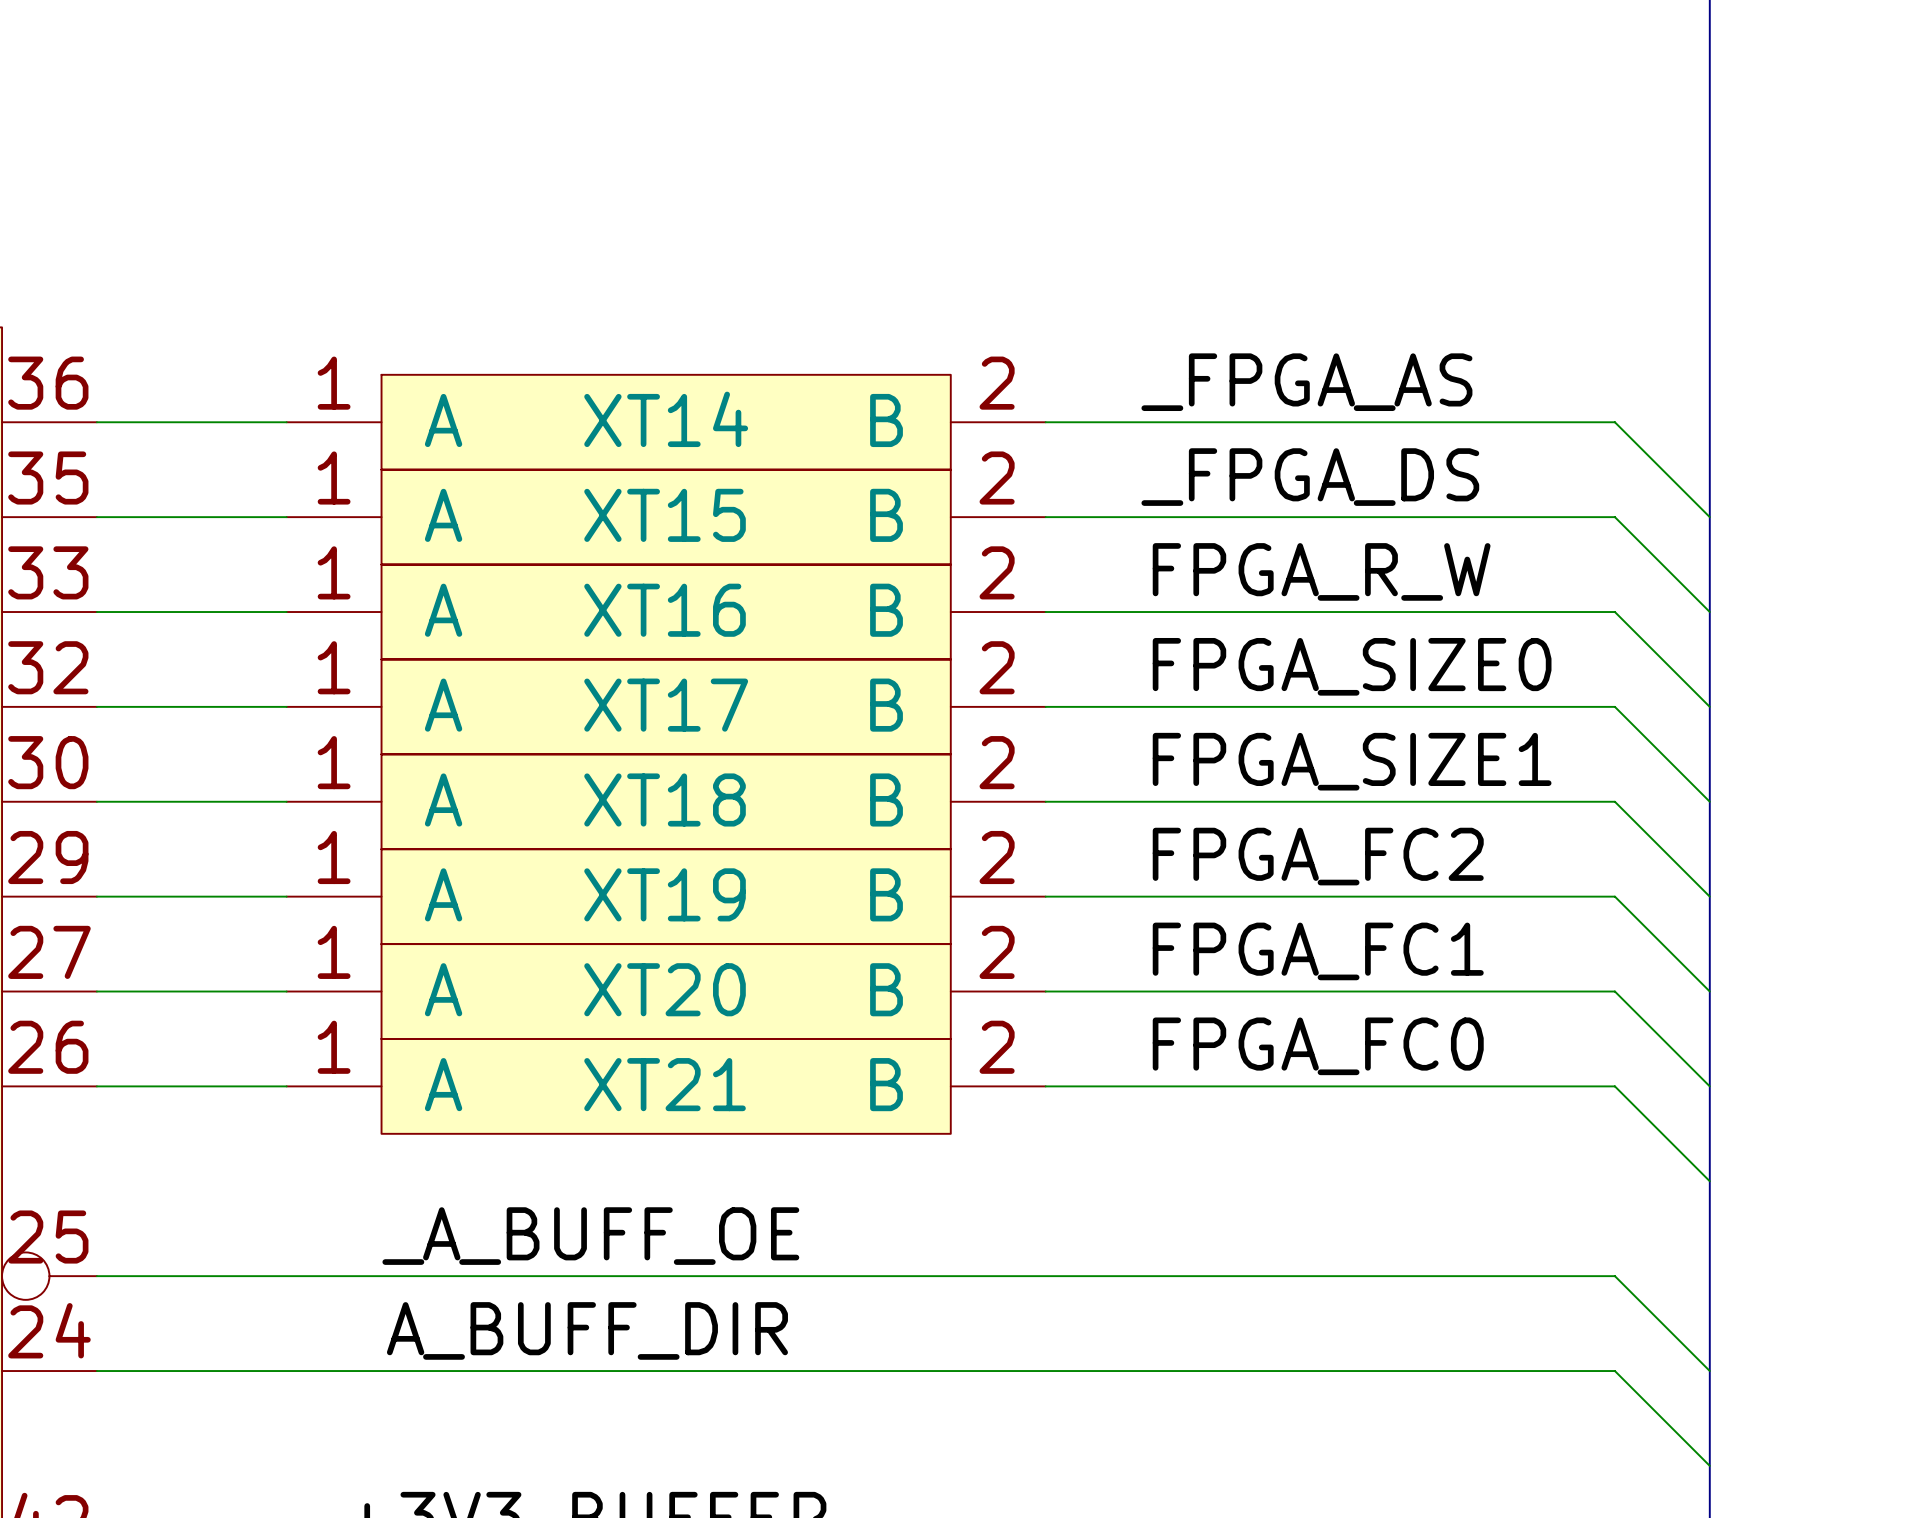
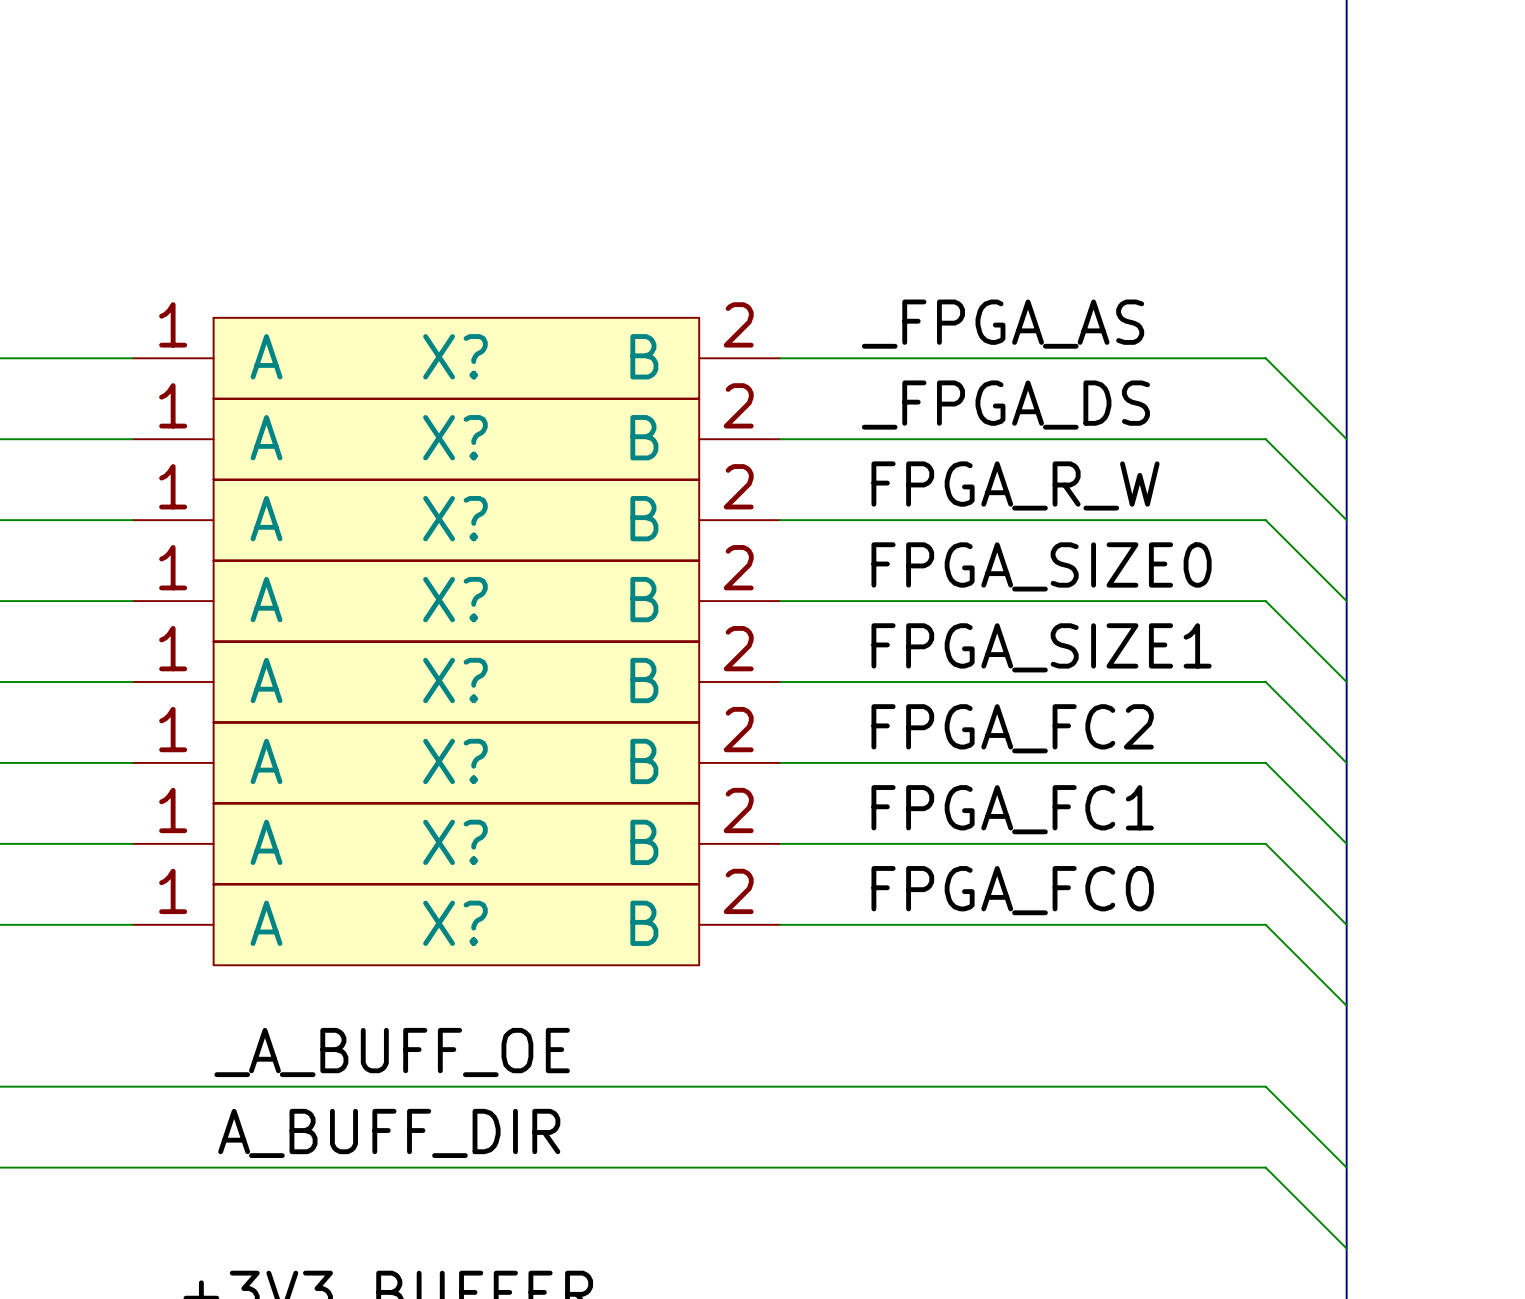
XT14 name: XT14 (666, 419) -> X? (455, 356)
XT15 name: XT15 (665, 515) -> X? (455, 437)
XT16 name: XT16 (665, 610) -> X? (455, 518)
XT17 name: XT17 (666, 705) -> X? (455, 599)
XT18 name: XT18 (665, 799) -> X? (455, 680)
XT19 name: XT19 (665, 894) -> X? (455, 761)
XT20 name: XT20 (665, 989) -> X? (455, 842)
XT21 name: XT21 (665, 1084) -> X? (455, 923)

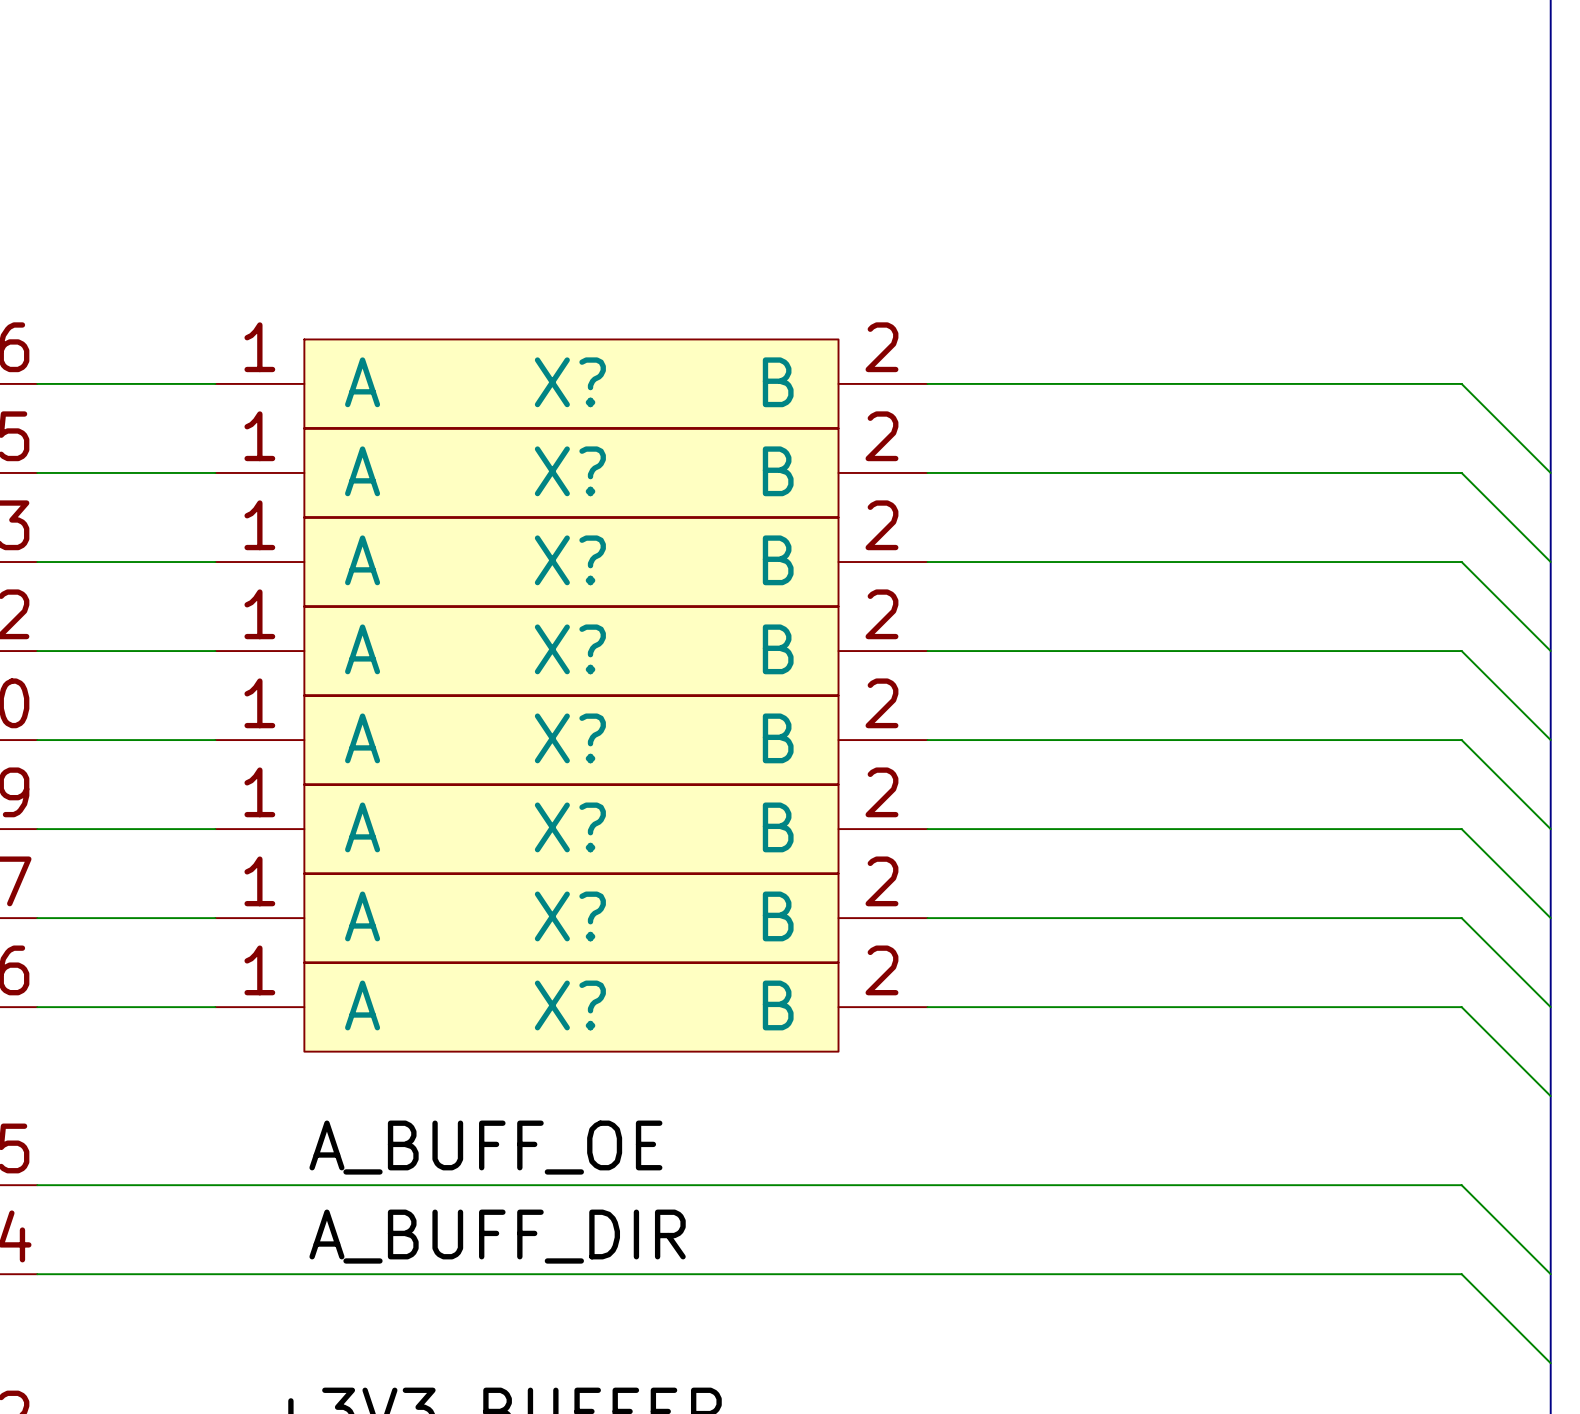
label: _FPGA_AS (1003, 324) -> none
label: _FPGA_DS (1005, 405) -> none
label: FPGA_R_W (1015, 485) -> none
label: FPGA_SIZE0 (1041, 566) -> none
label: FPGA_SIZE1 (1041, 647) -> none
label: FPGA_FC2 (1012, 728) -> none
label: FPGA_FC1 (1012, 809) -> none
label: FPGA_FC0 (1012, 890) -> none
label: _A_BUFF_OE (392, 1052) -> A_BUFF_OE (485, 1147)

